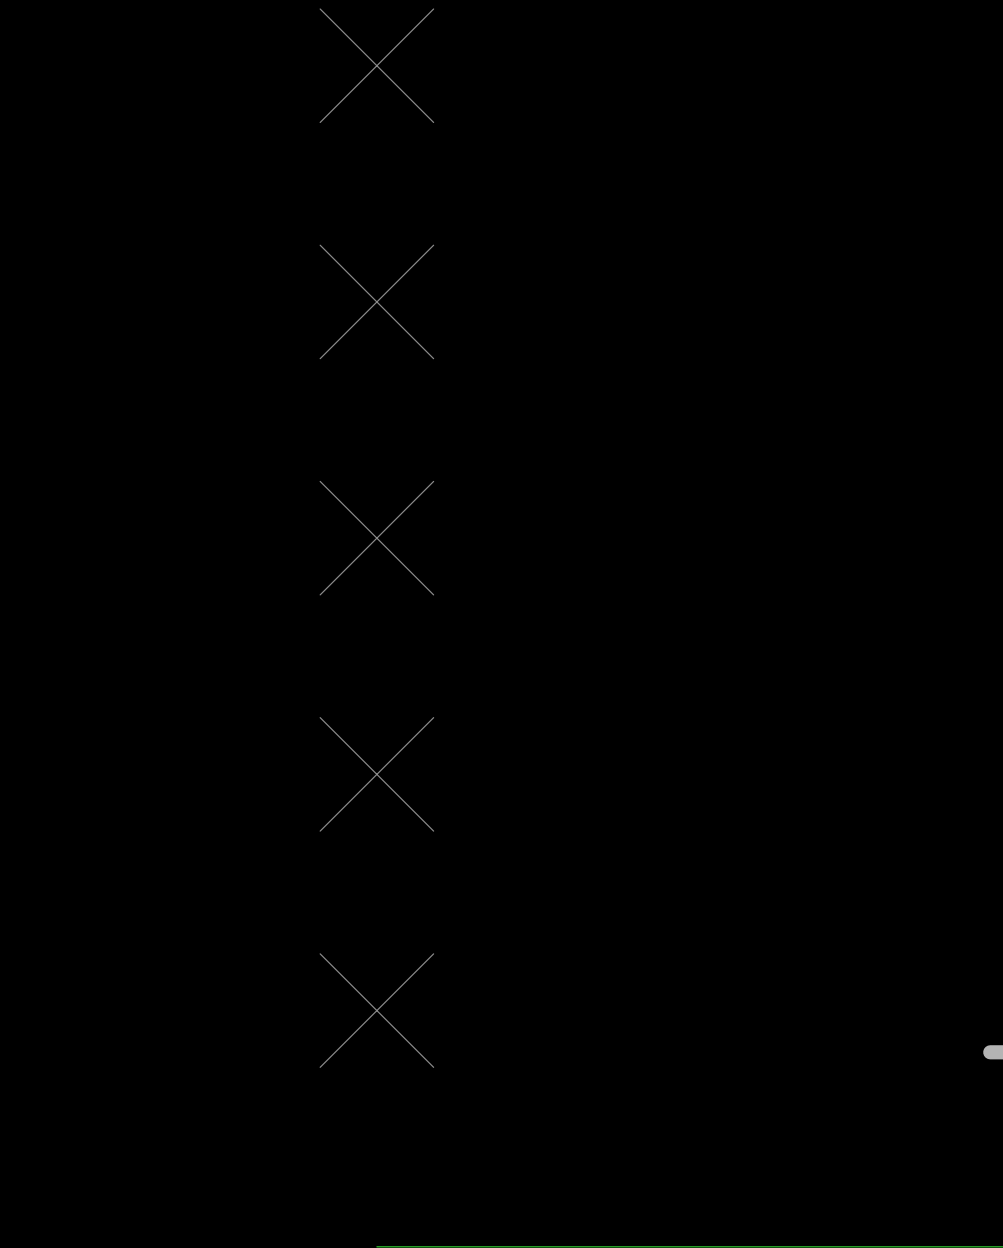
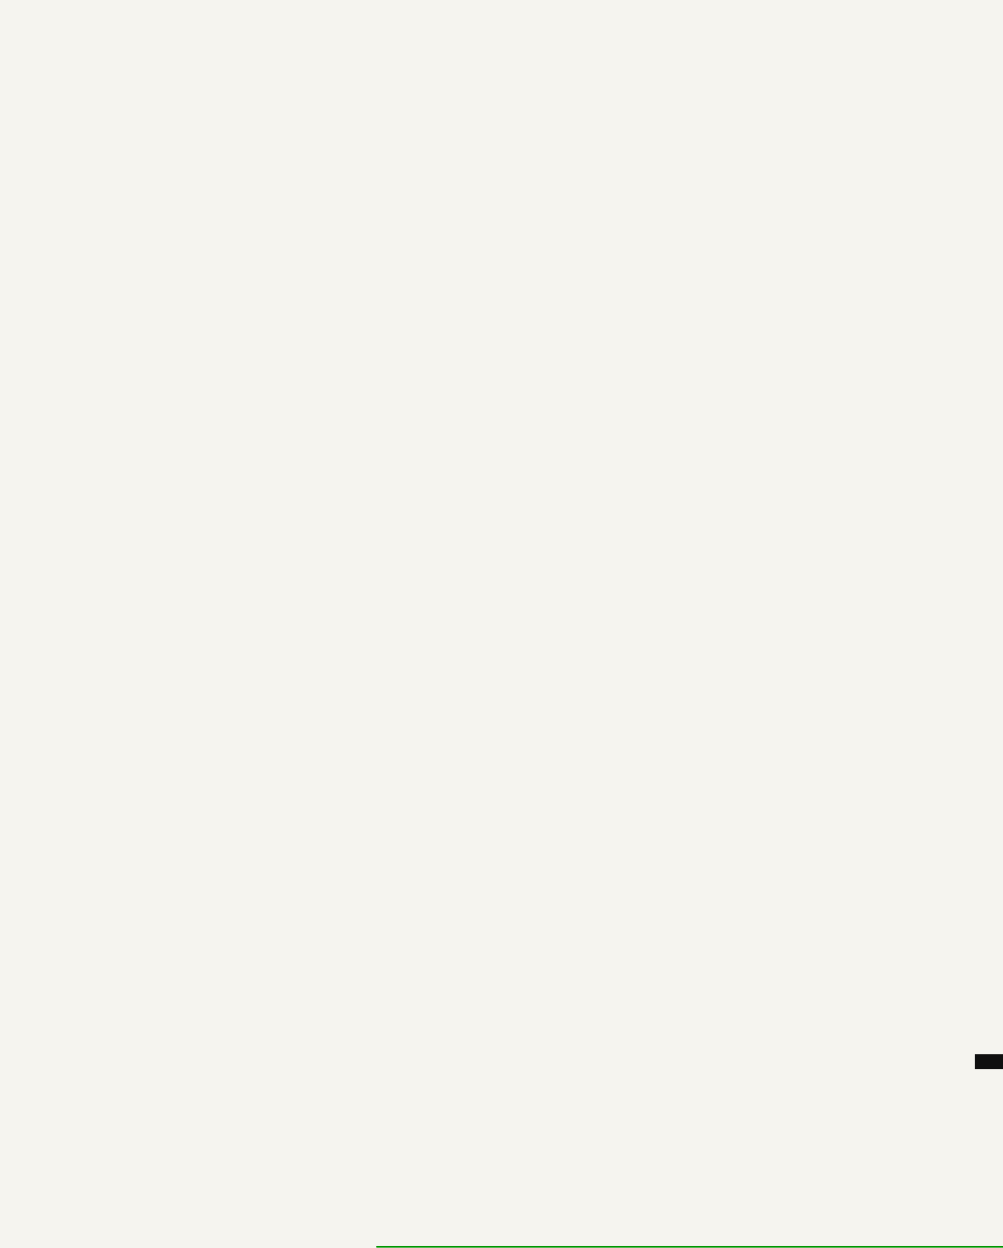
no-connect mark: (376, 65) -> none
no-connect mark: (376, 301) -> none
no-connect mark: (376, 538) -> none
no-connect mark: (376, 774) -> none
no-connect mark: (376, 1010) -> none

